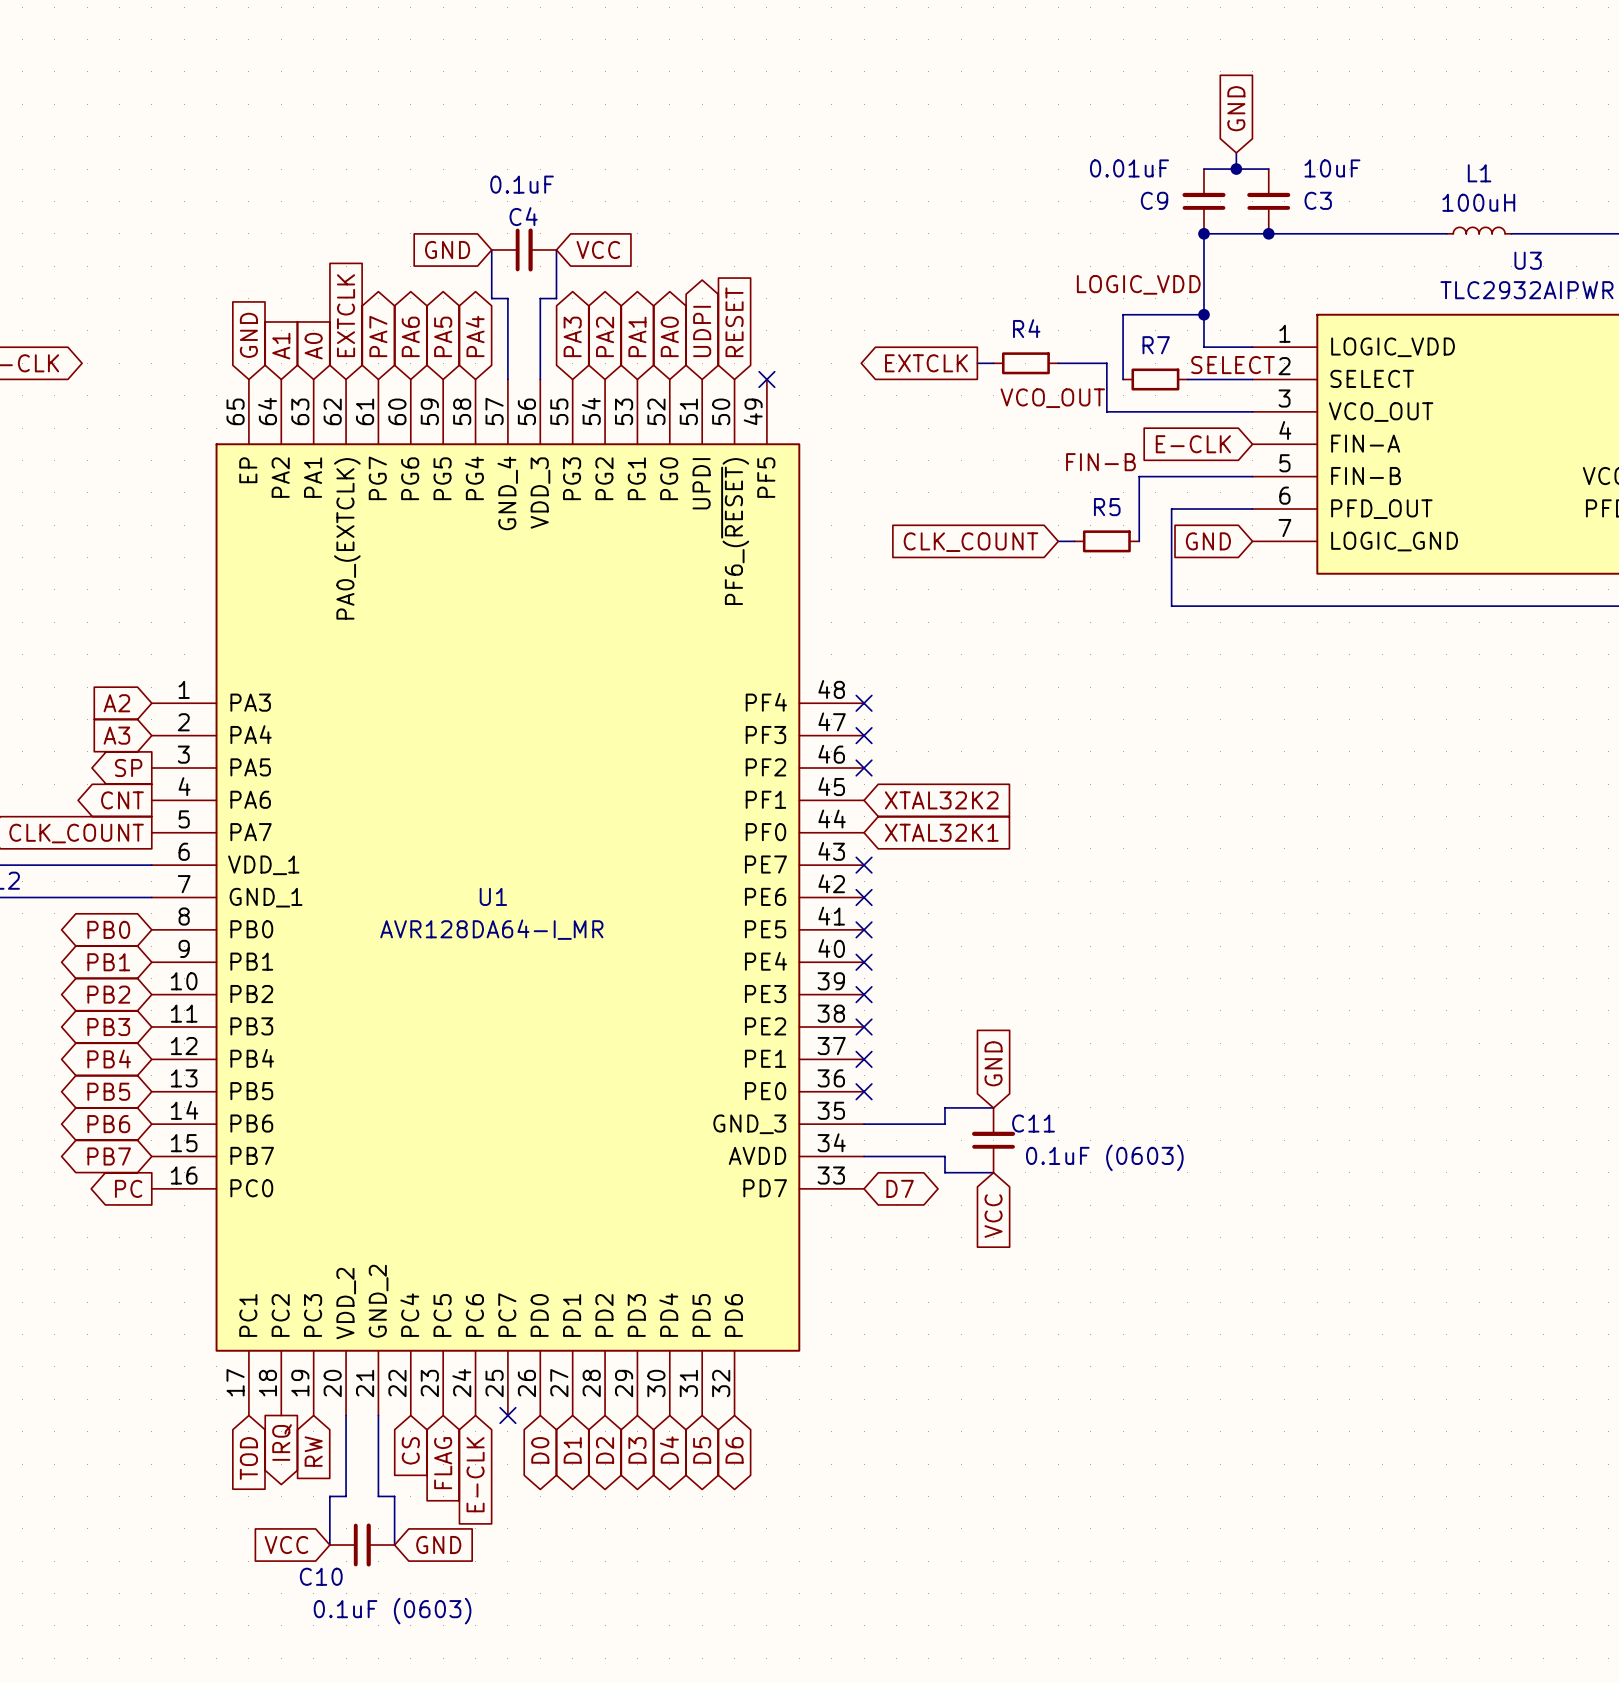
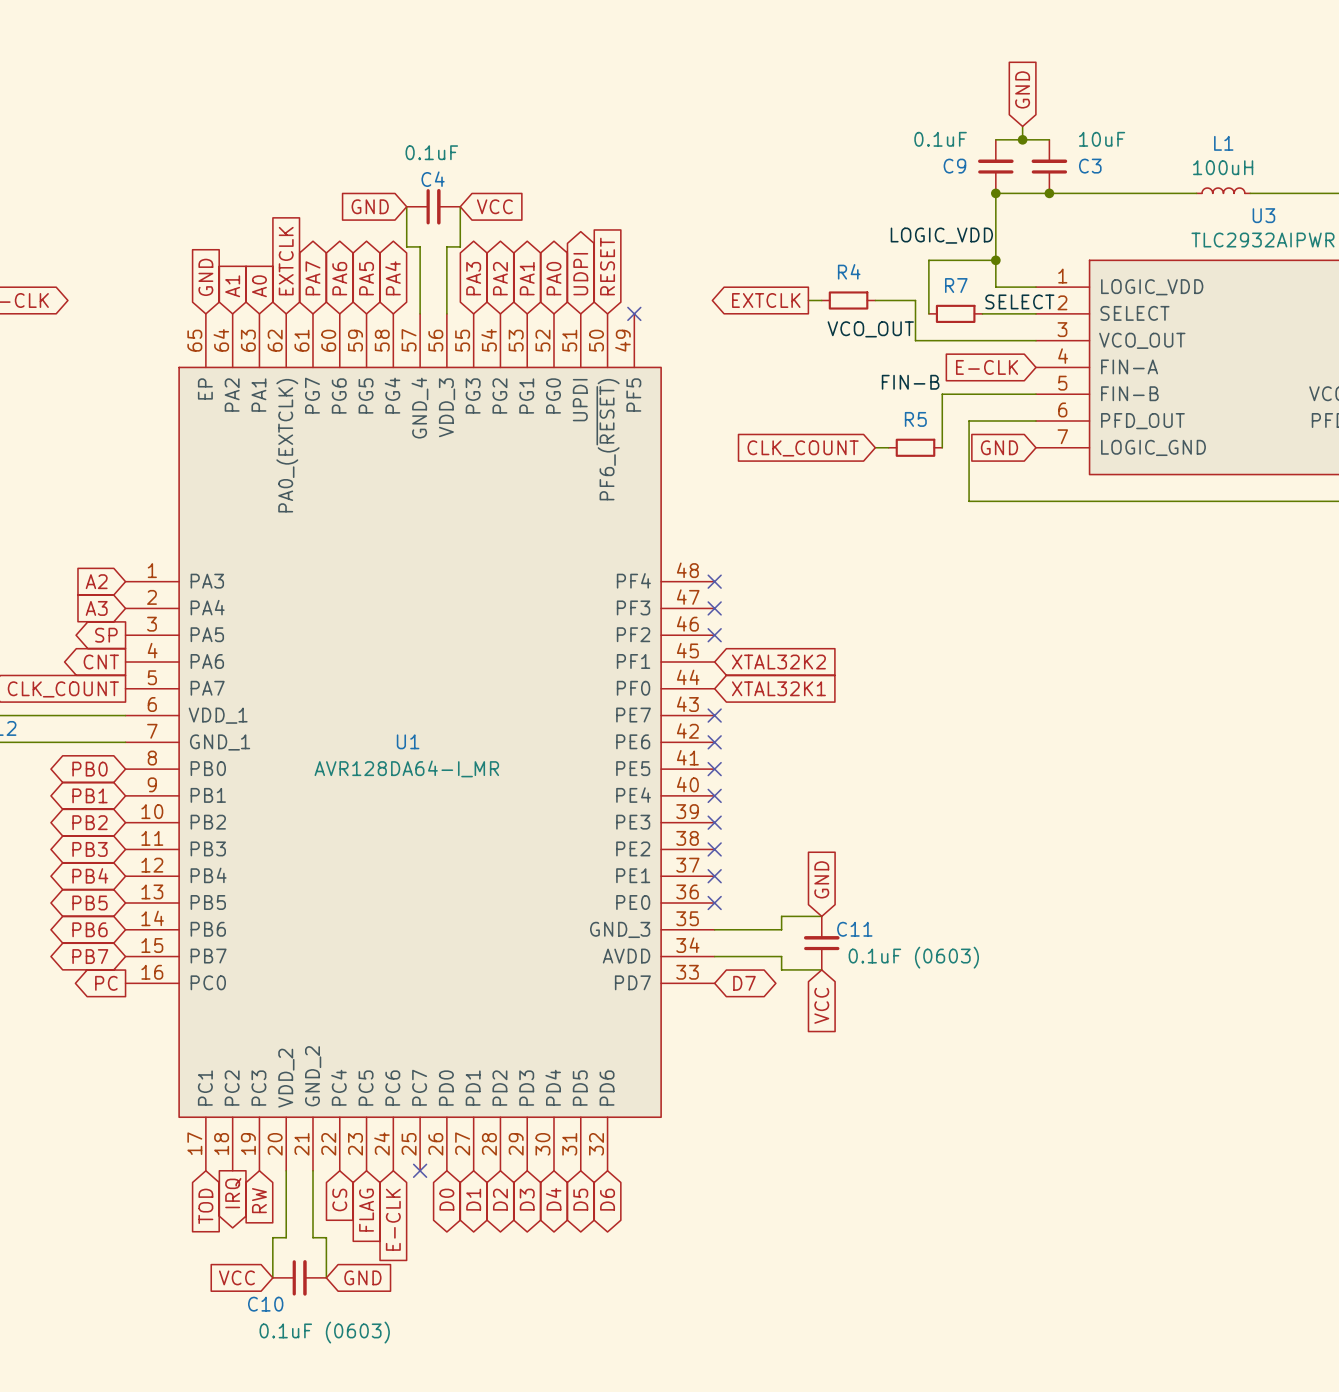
C9 value: 0.01uF (1129, 168) -> 0.1uF (940, 139)

